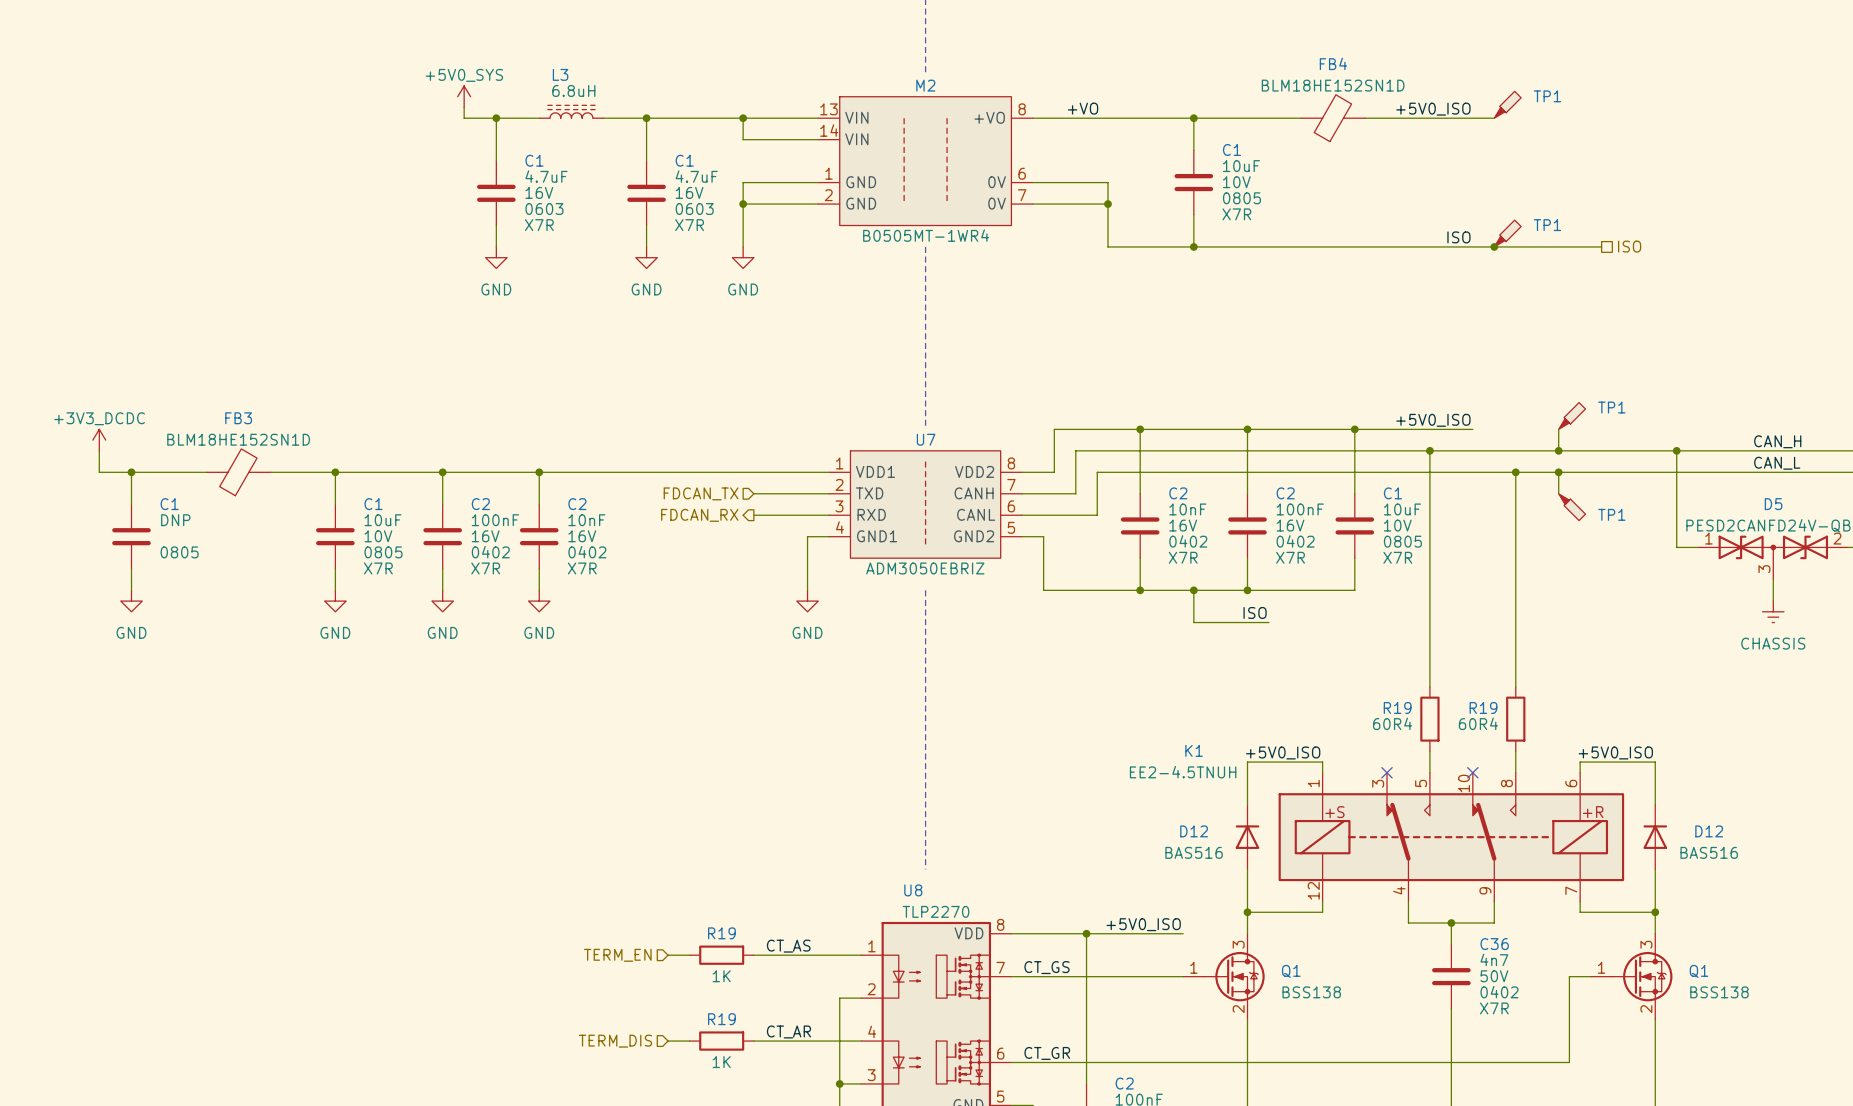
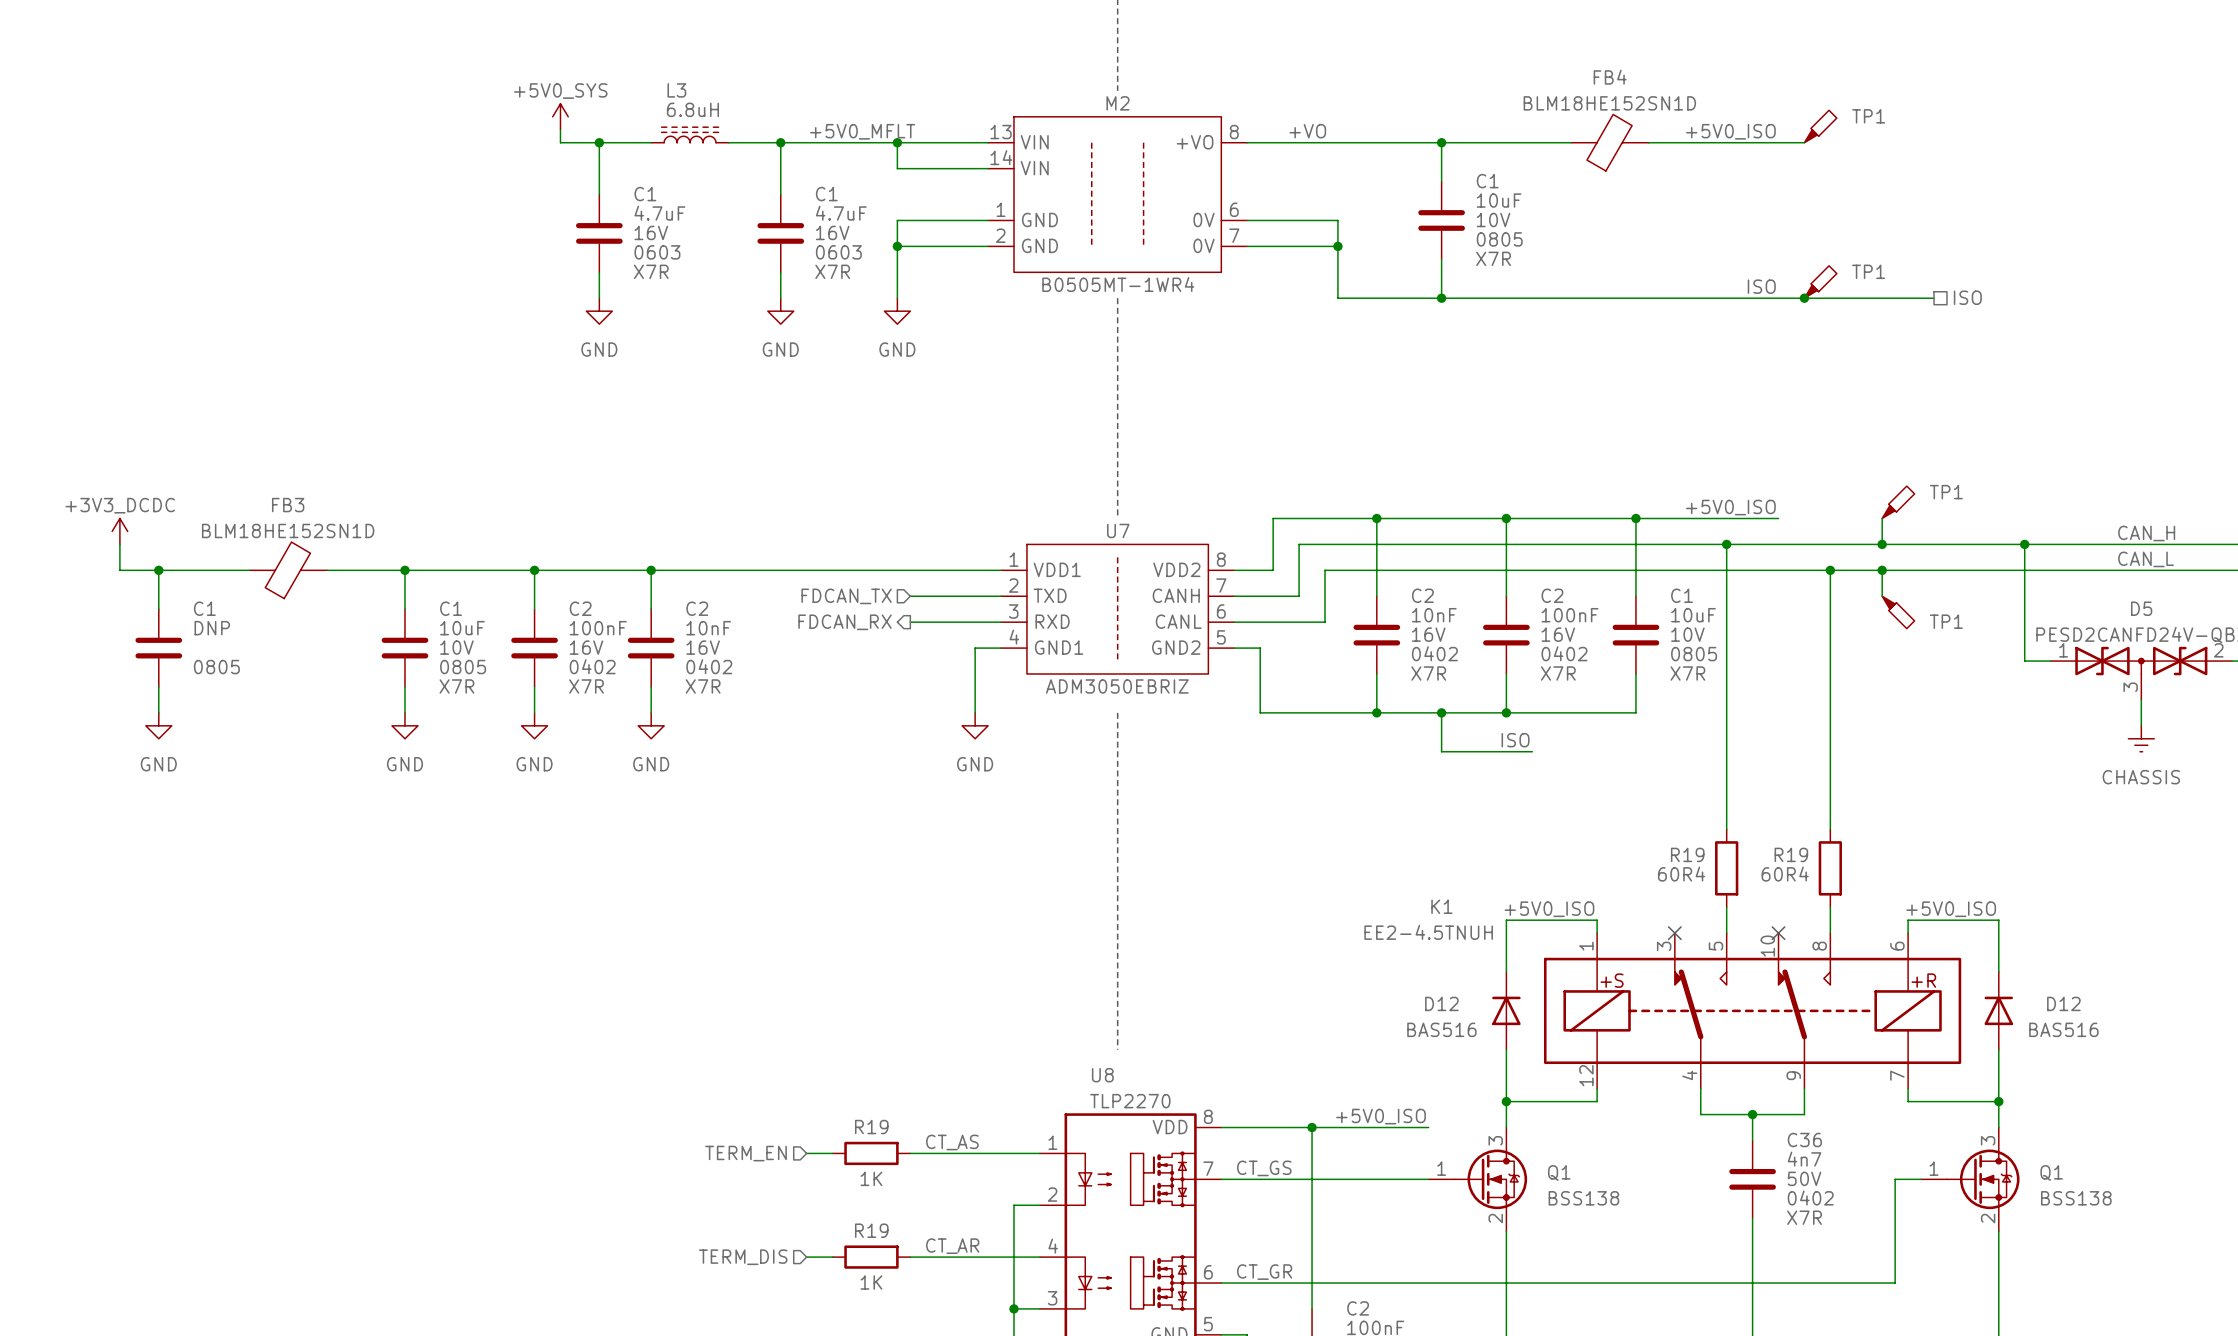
label: none -> +5V0_MFLT (862, 131)

